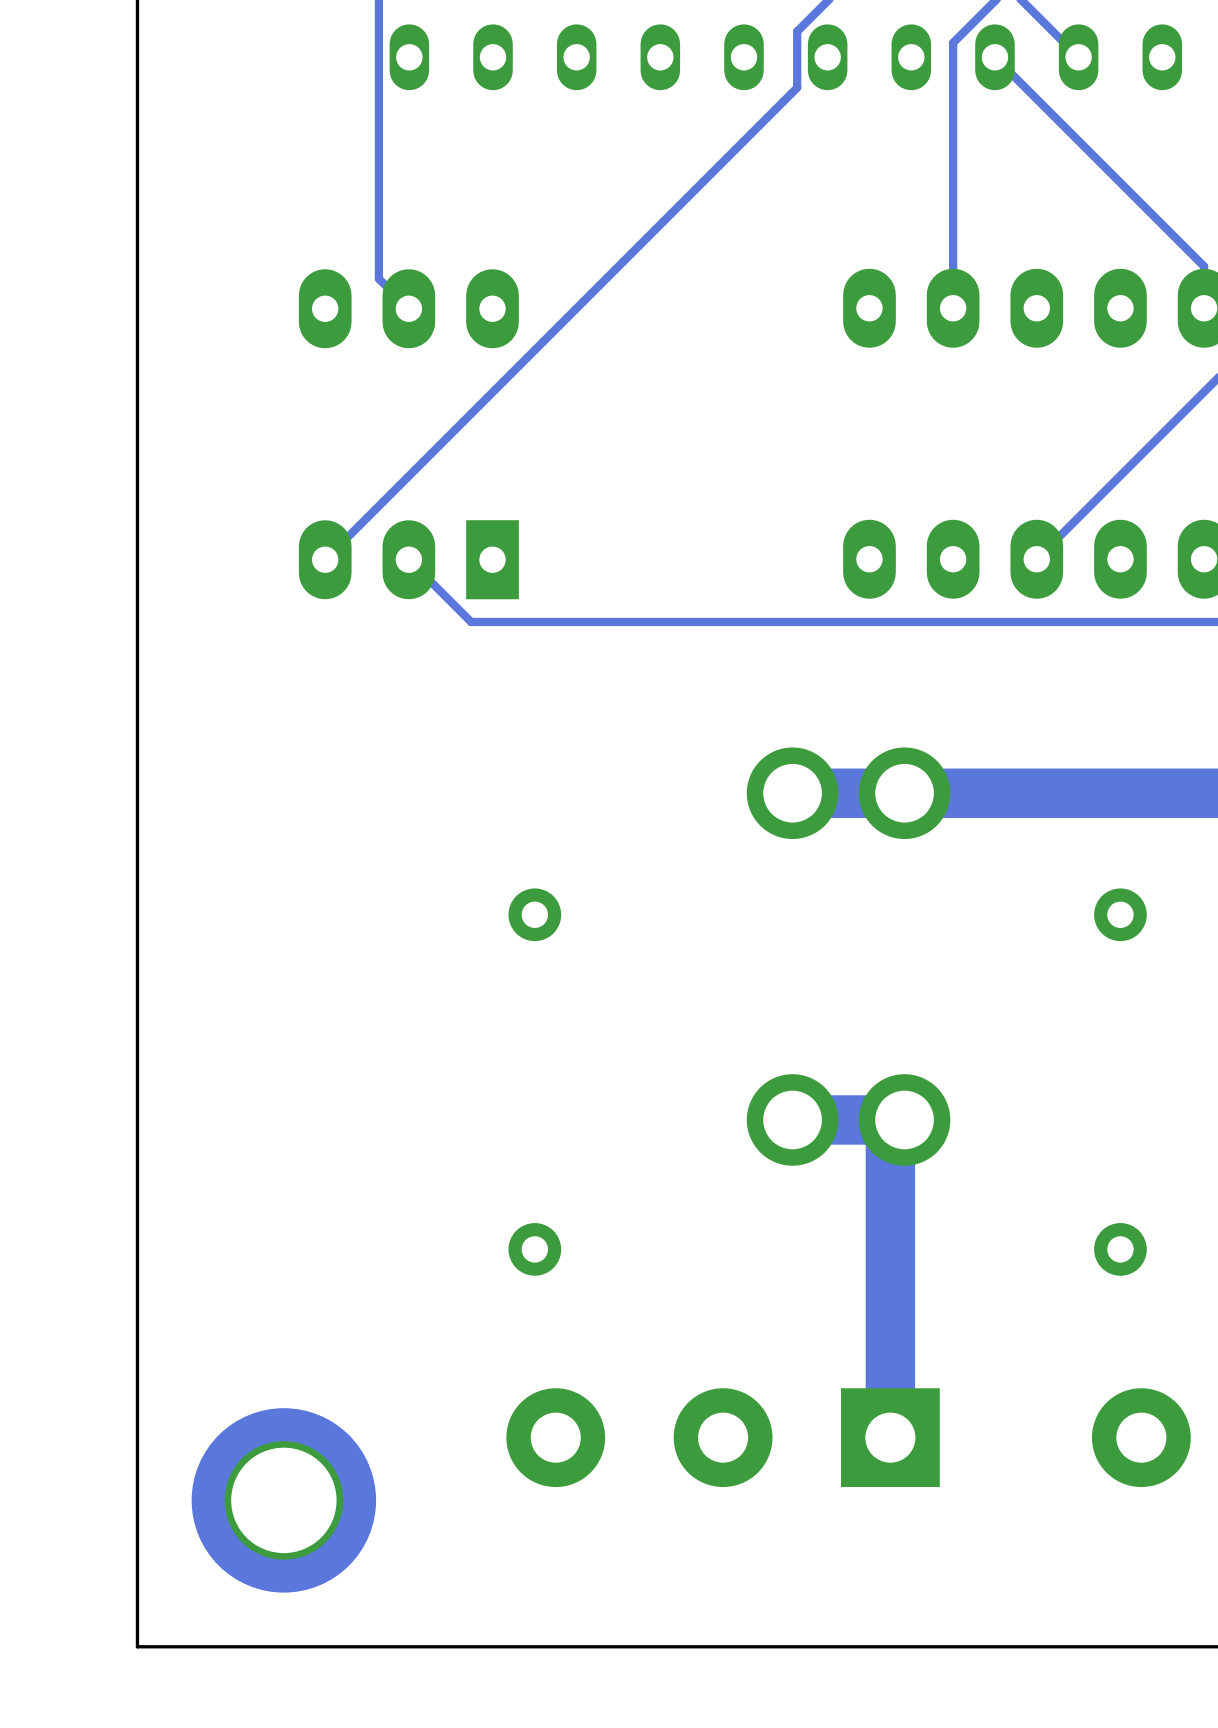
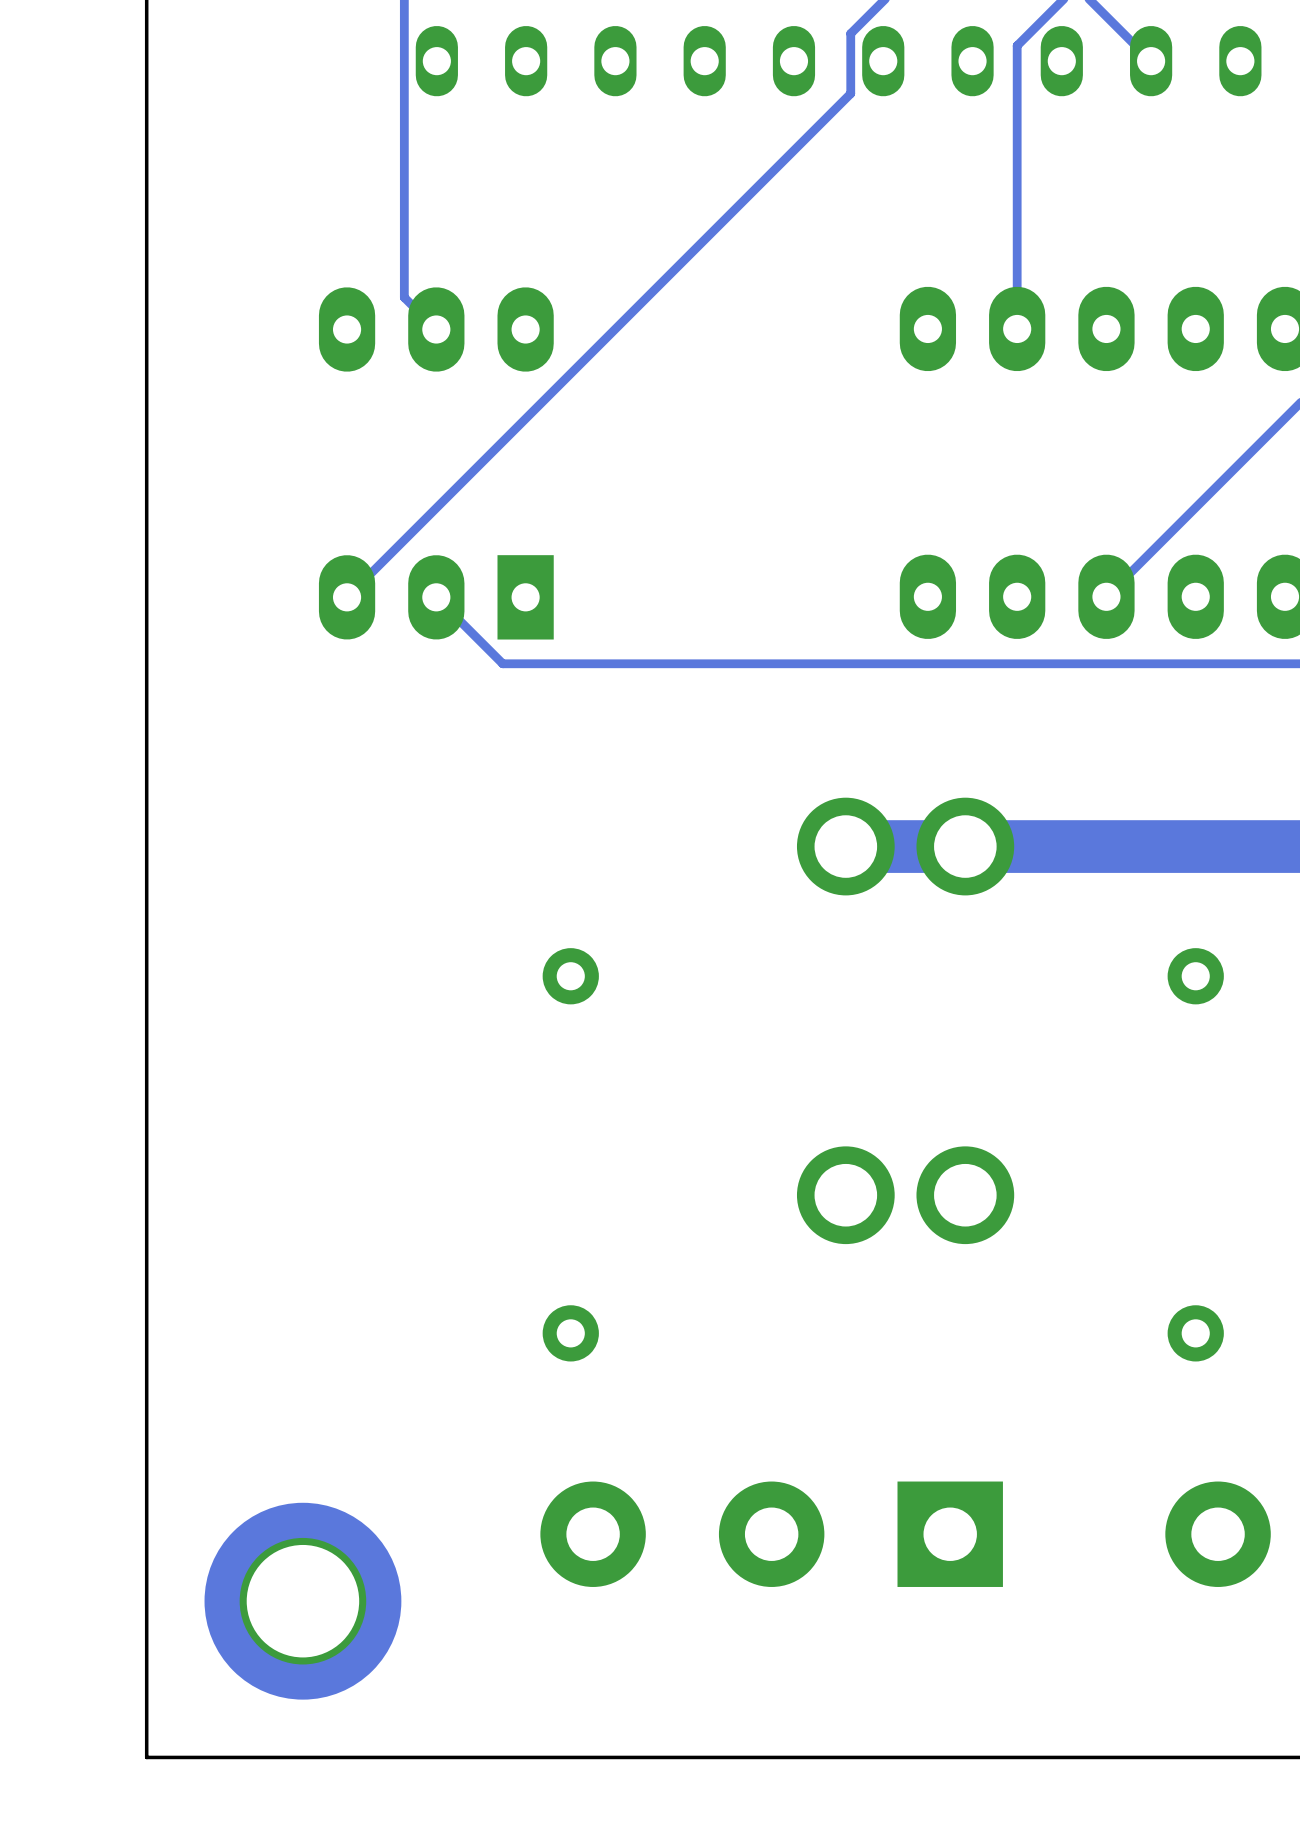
track: (994, 57) (1204, 266) (1204, 308) -> none
track: (792, 1119) (904, 1119) (890, 1134) (890, 1437) -> none

